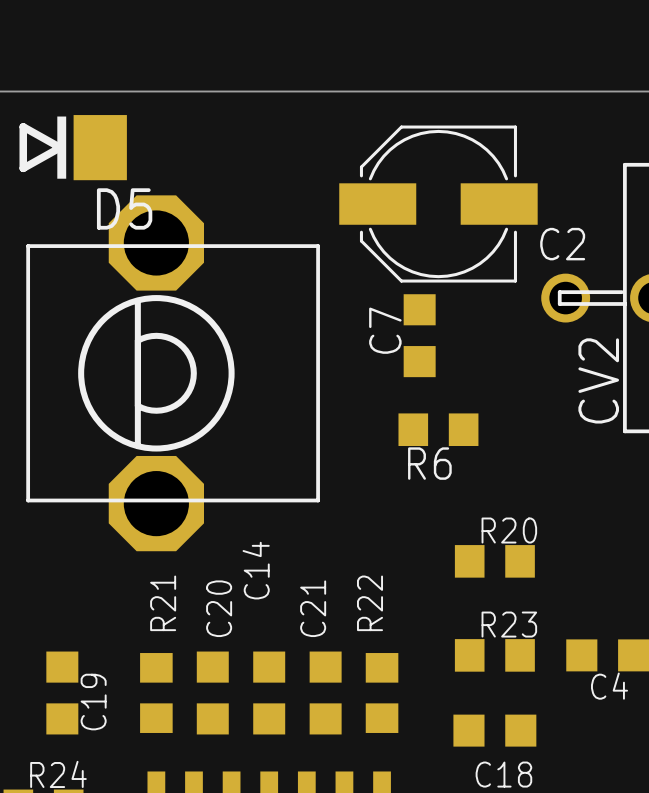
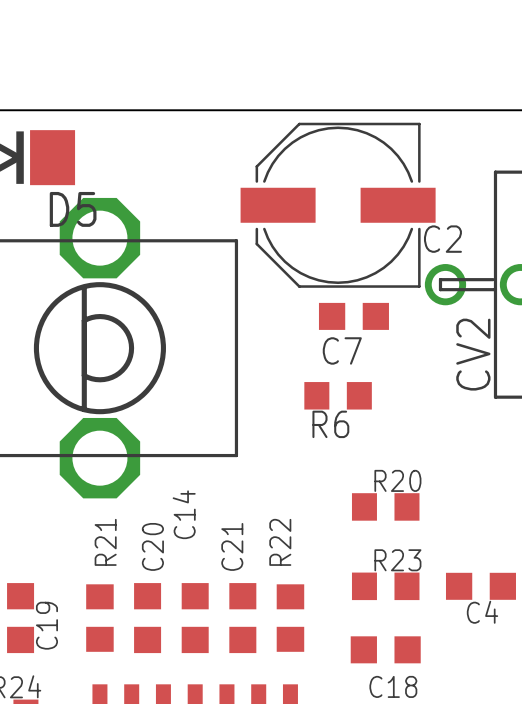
C2 footprint: [339, 125, 538, 283] -> [240, 122, 436, 288]
C7 rotation: 0° (419, 335) -> 90° clockwise (353, 316)

